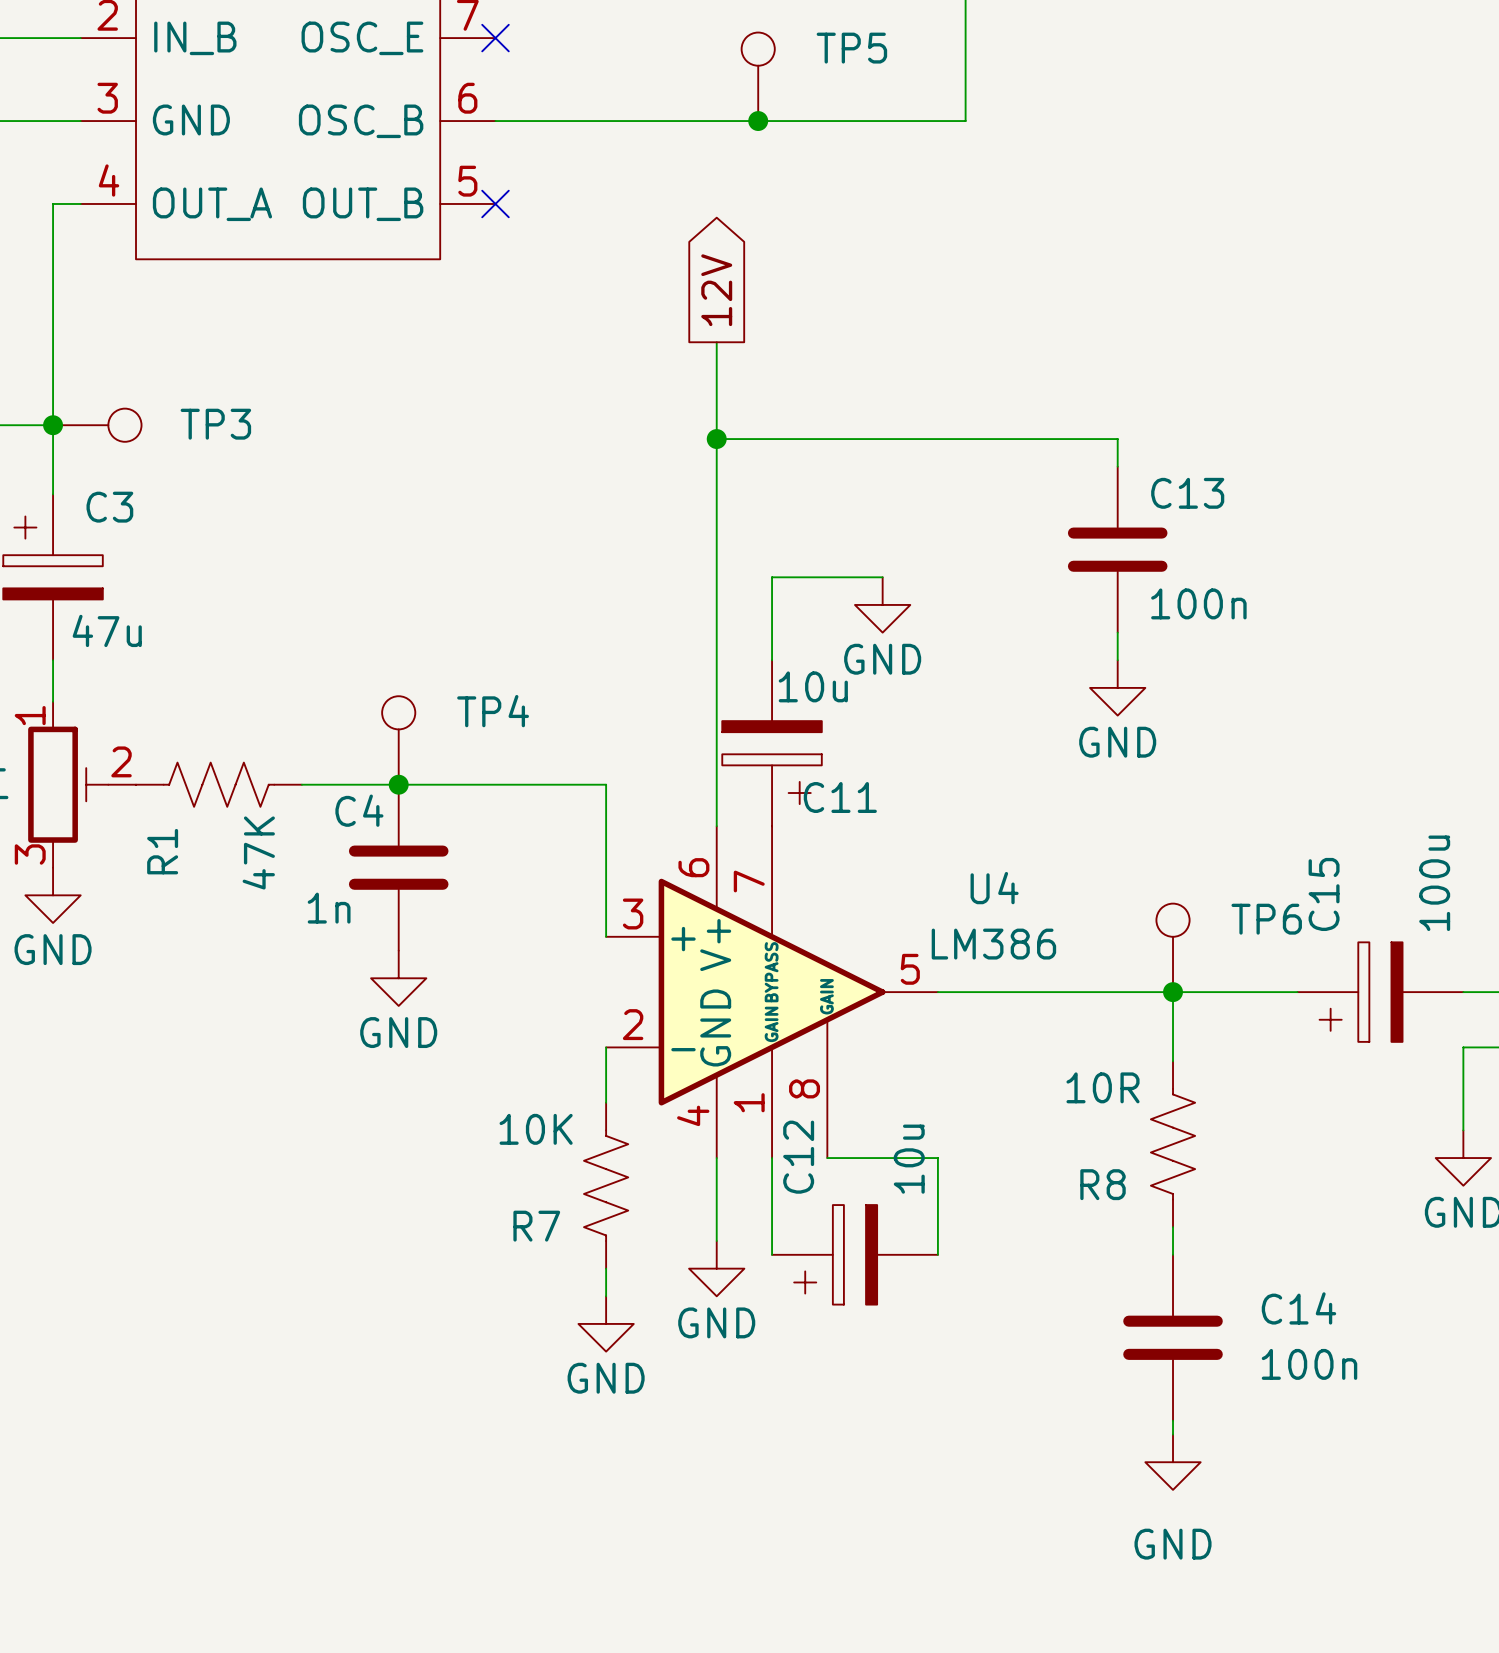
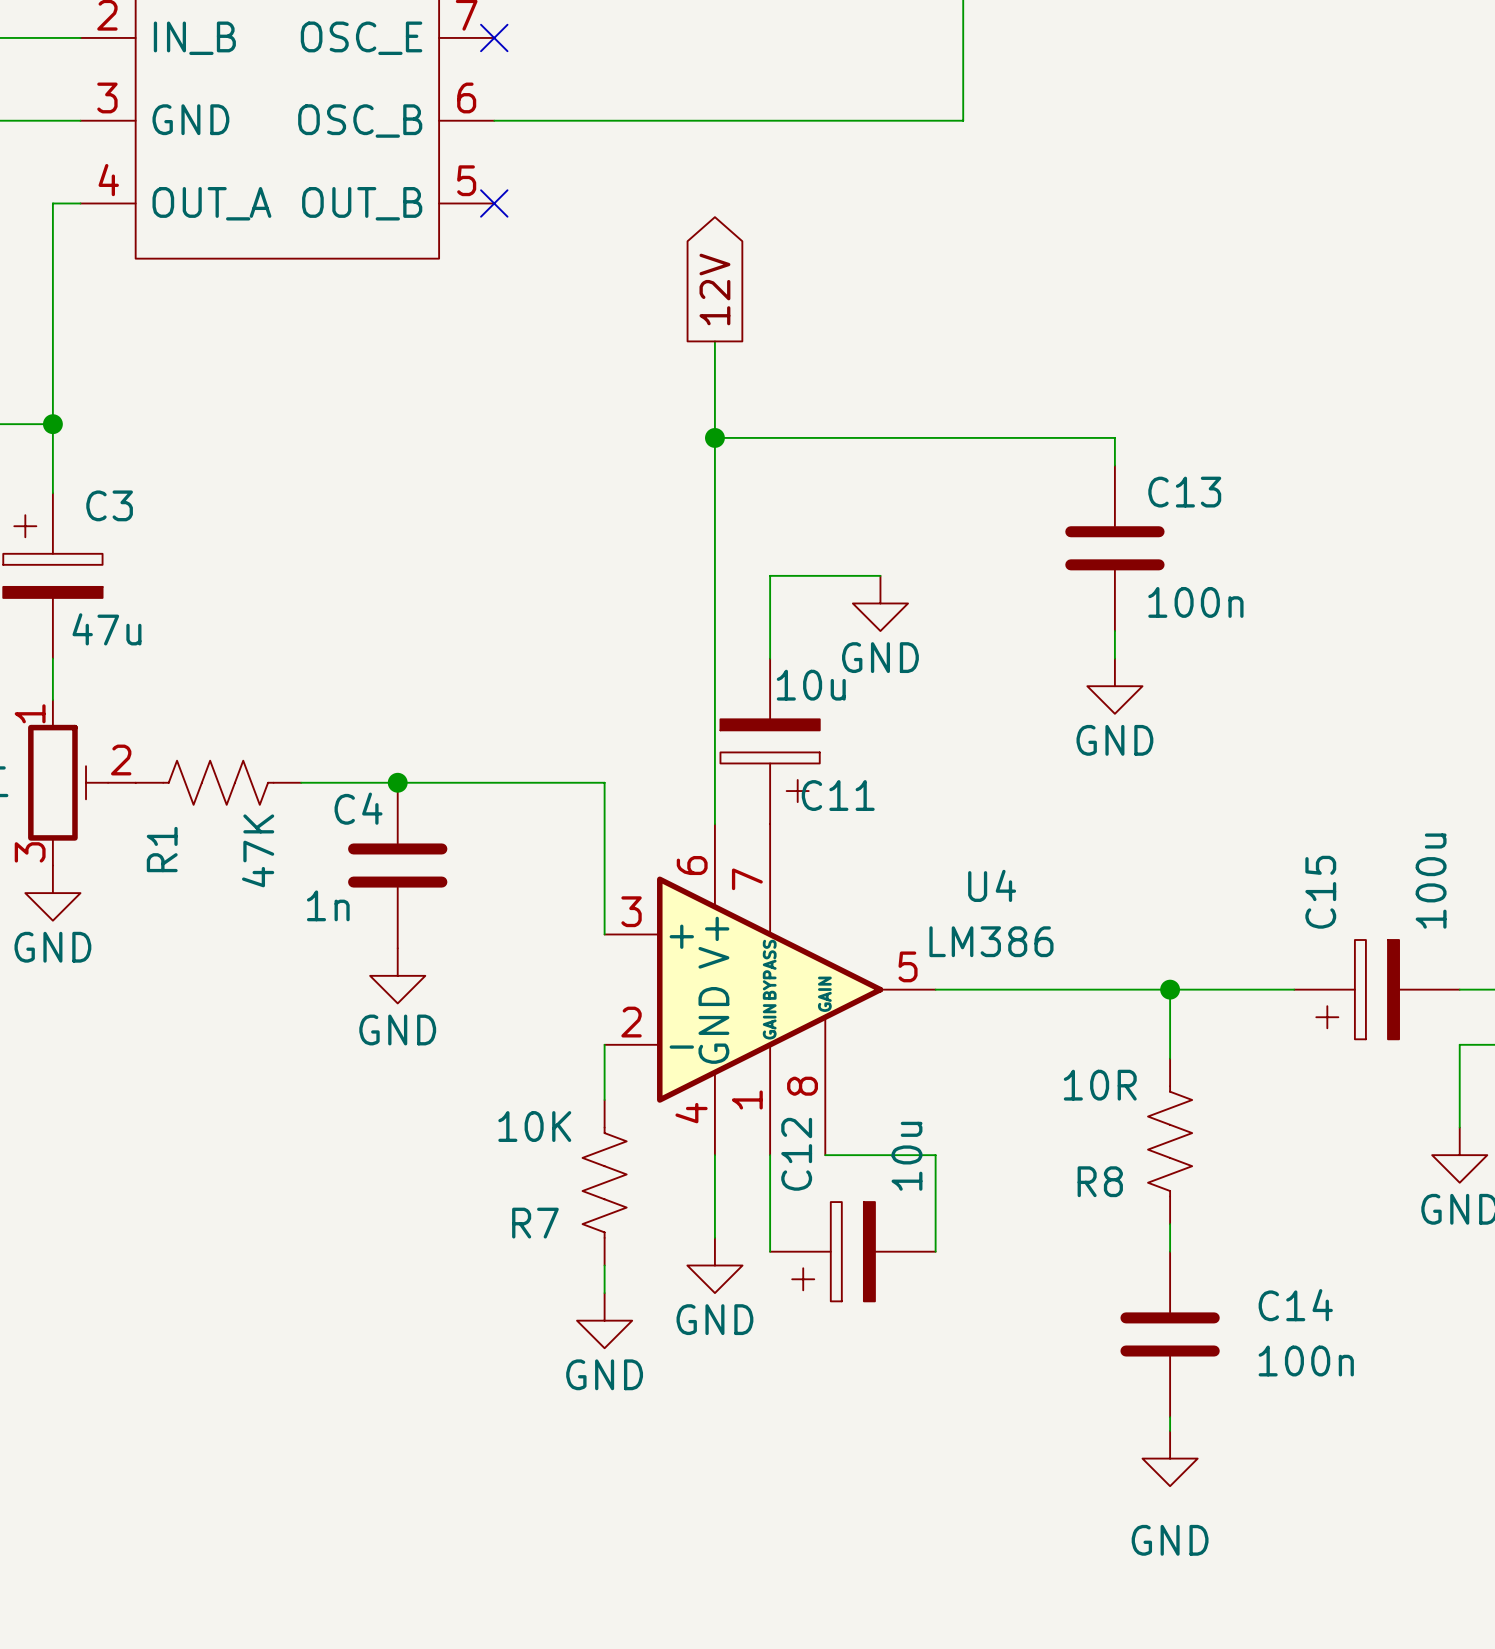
TP5: (758, 76) -> none
junction: (758, 121) -> none
TP3: (97, 425) -> none
TP4: (398, 740) -> none
TP6: (1173, 947) -> none

